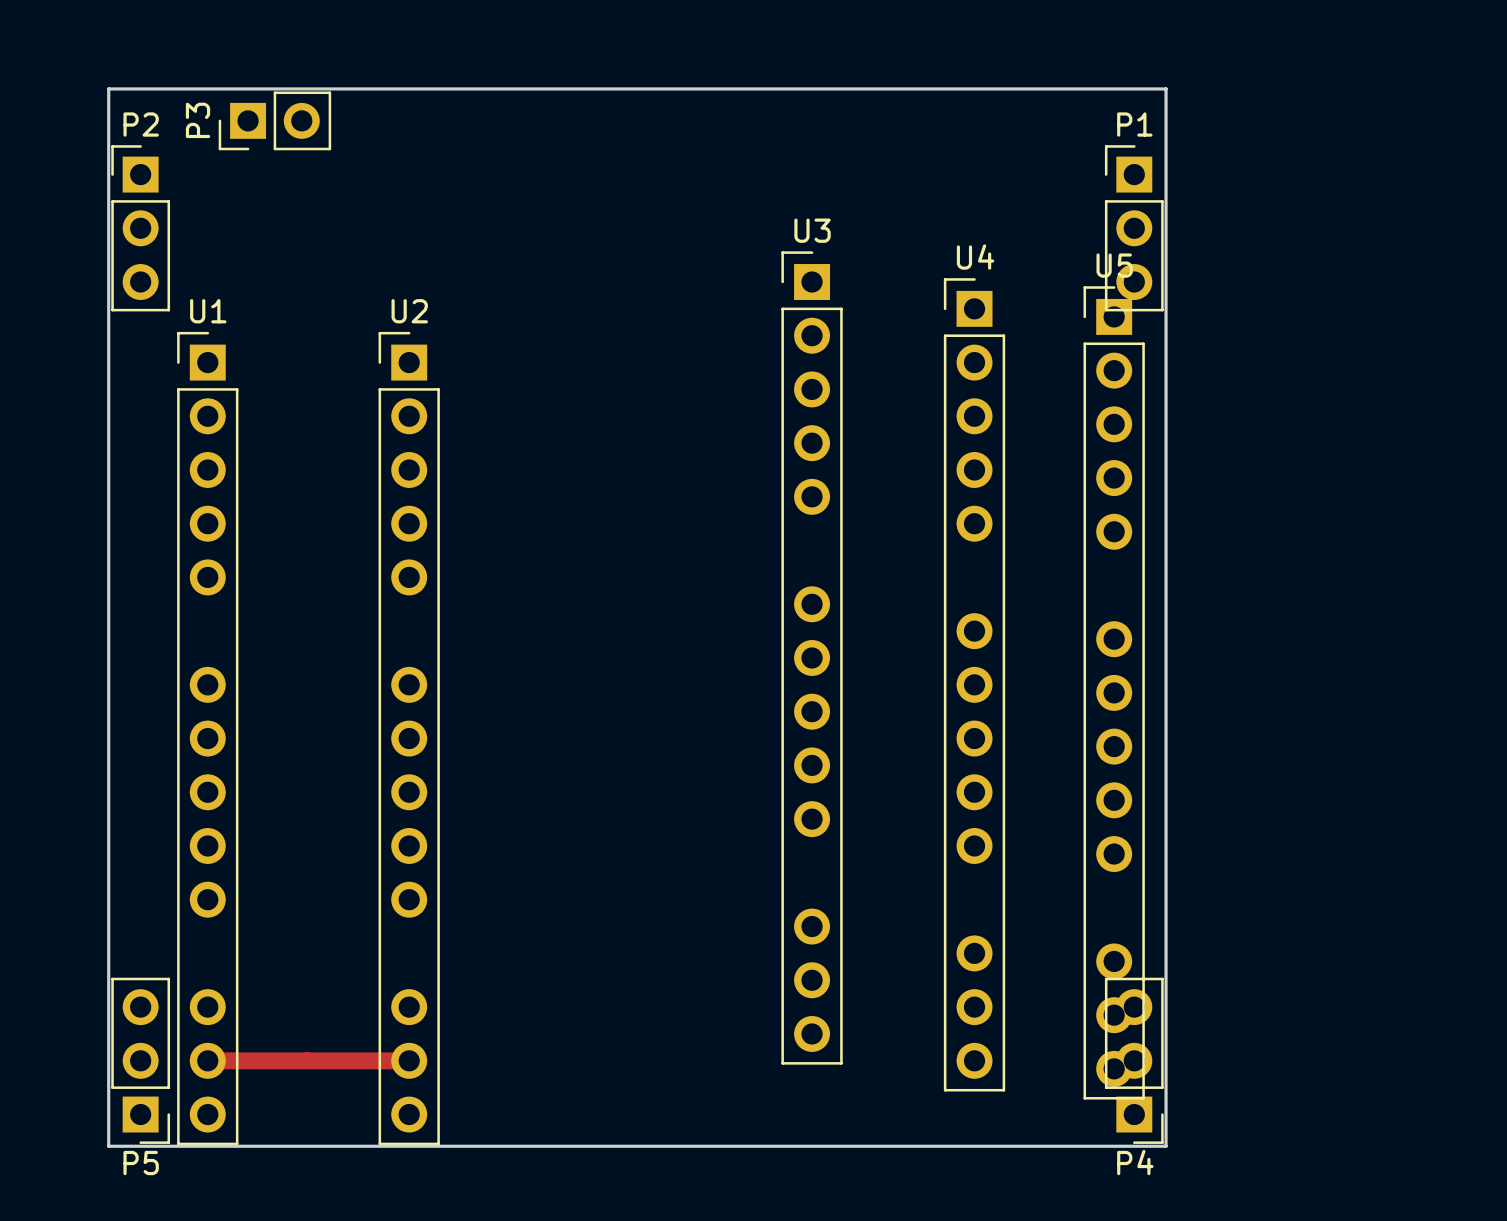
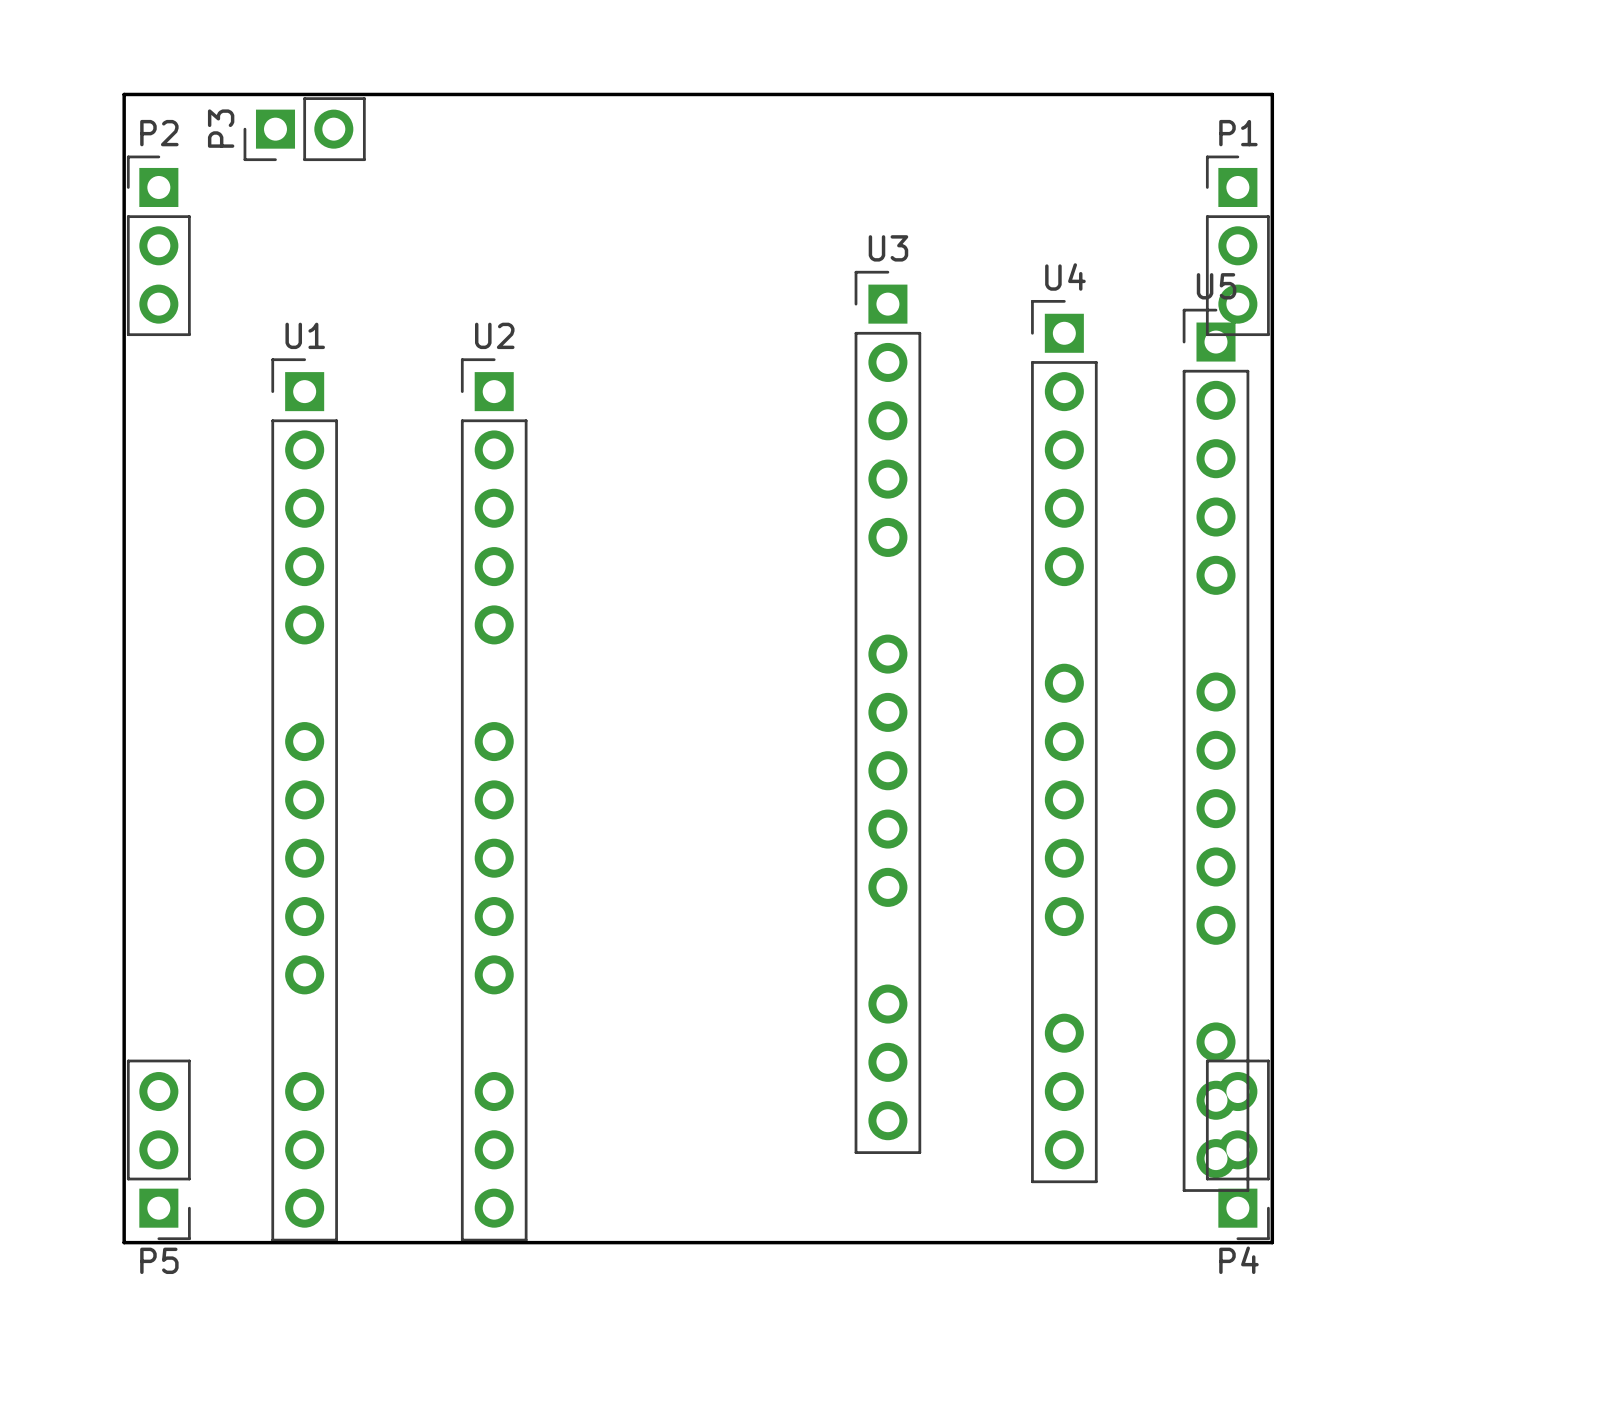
U1 position: (207, 738) -> (304, 799)
U2 position: (409, 738) -> (494, 799)
track: (207, 1060) (409, 1060) -> none

